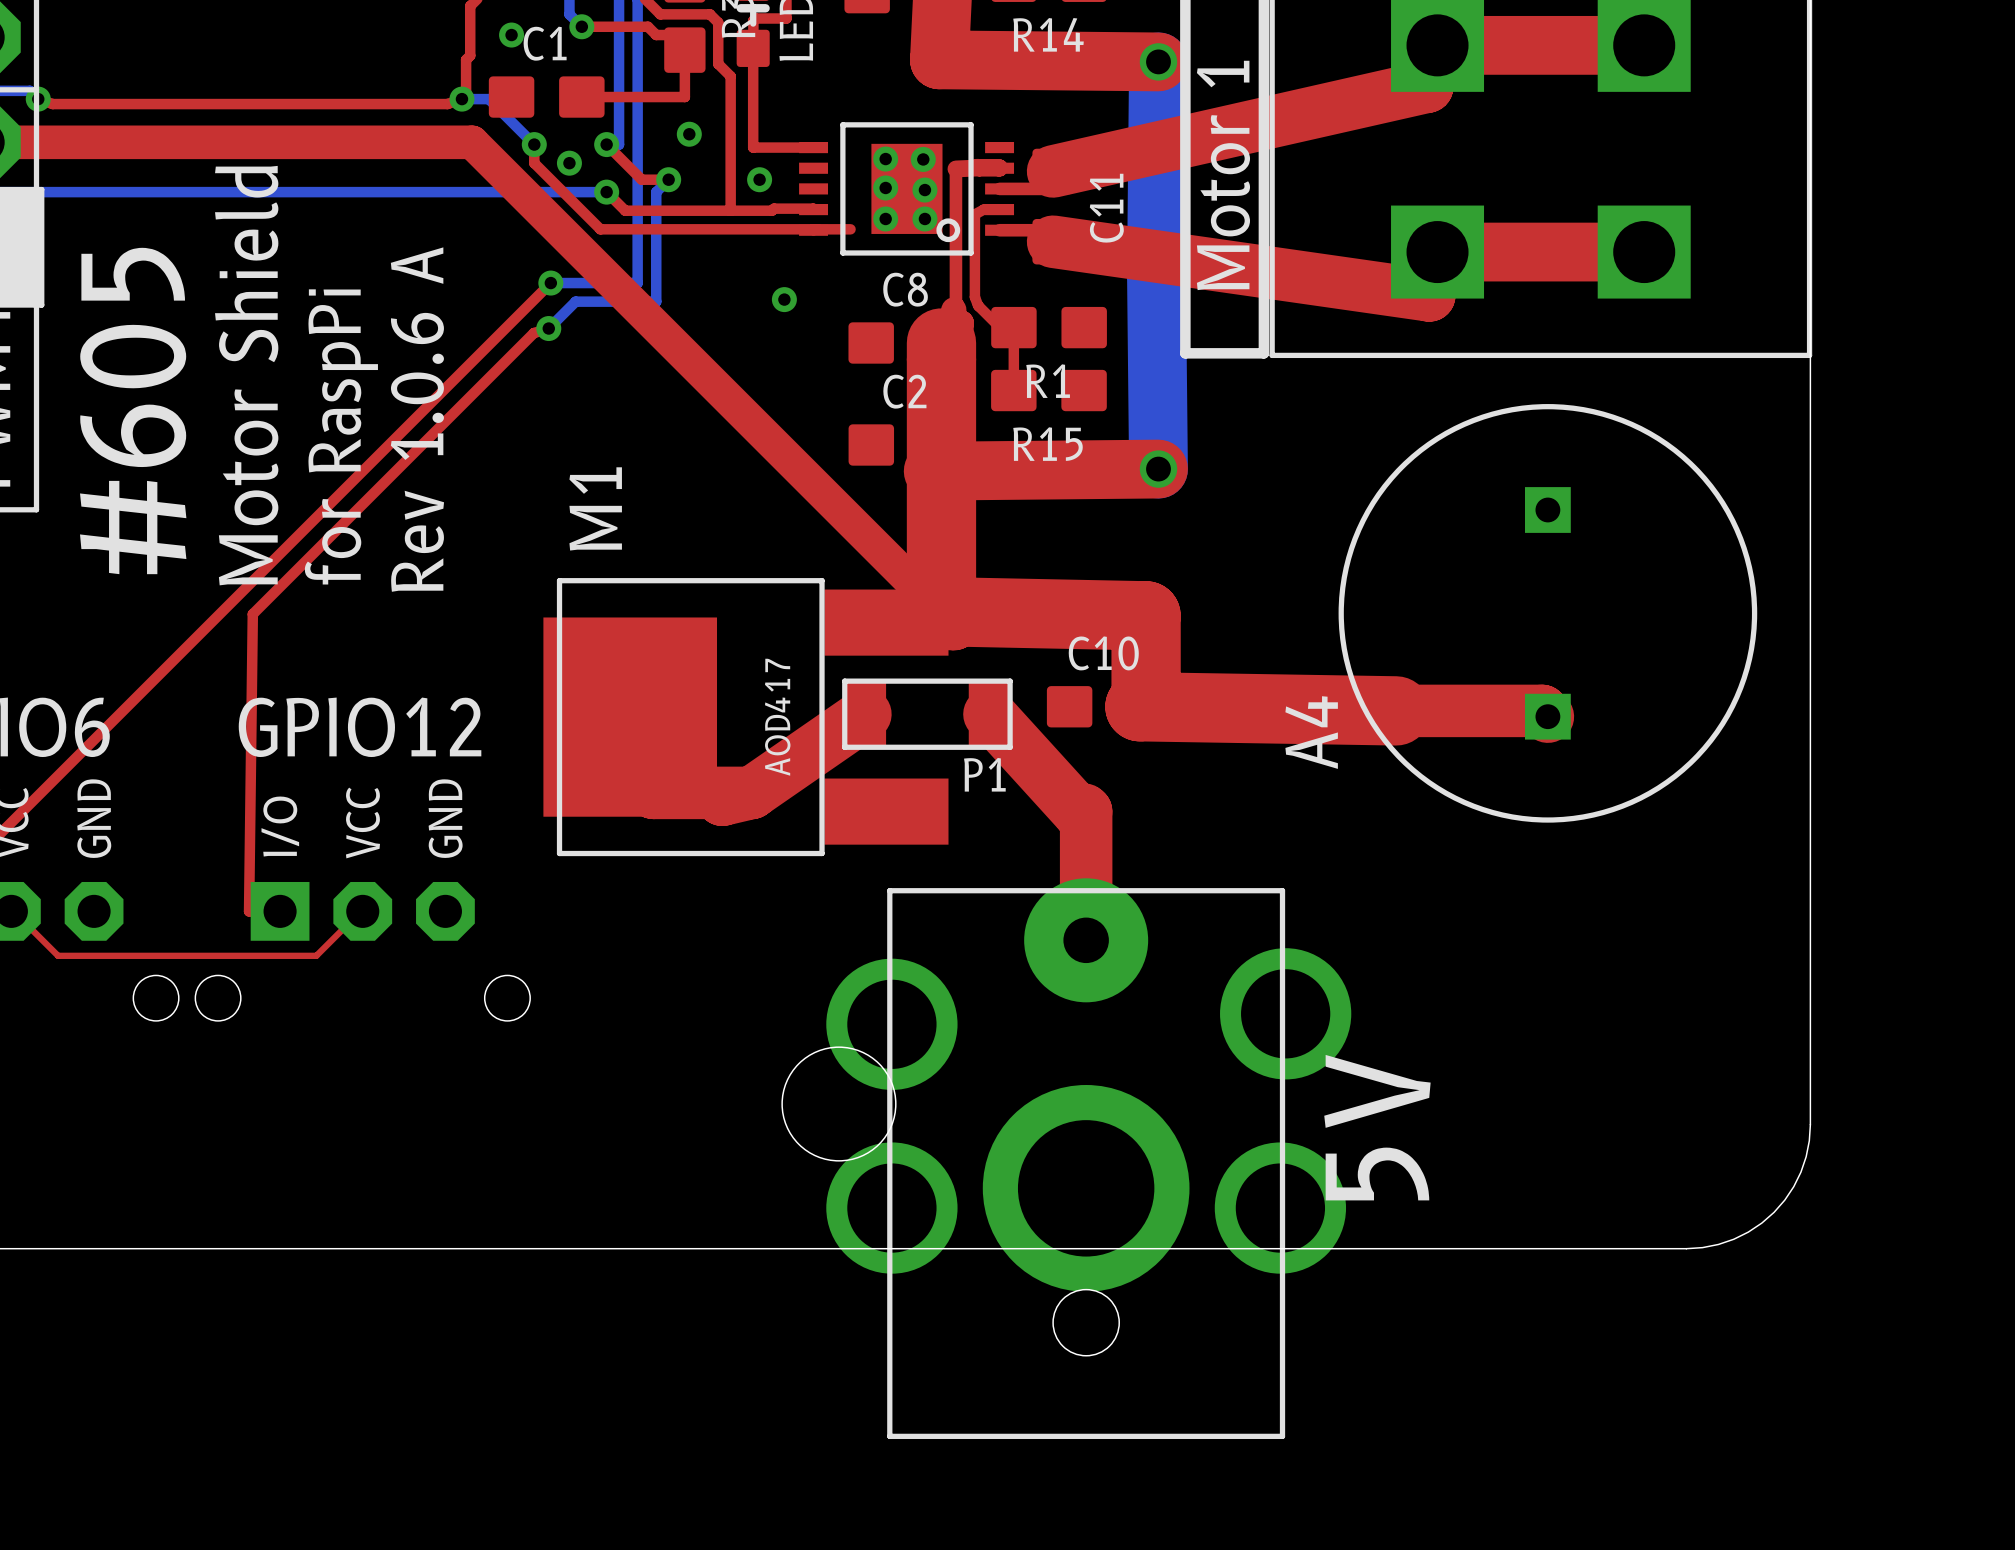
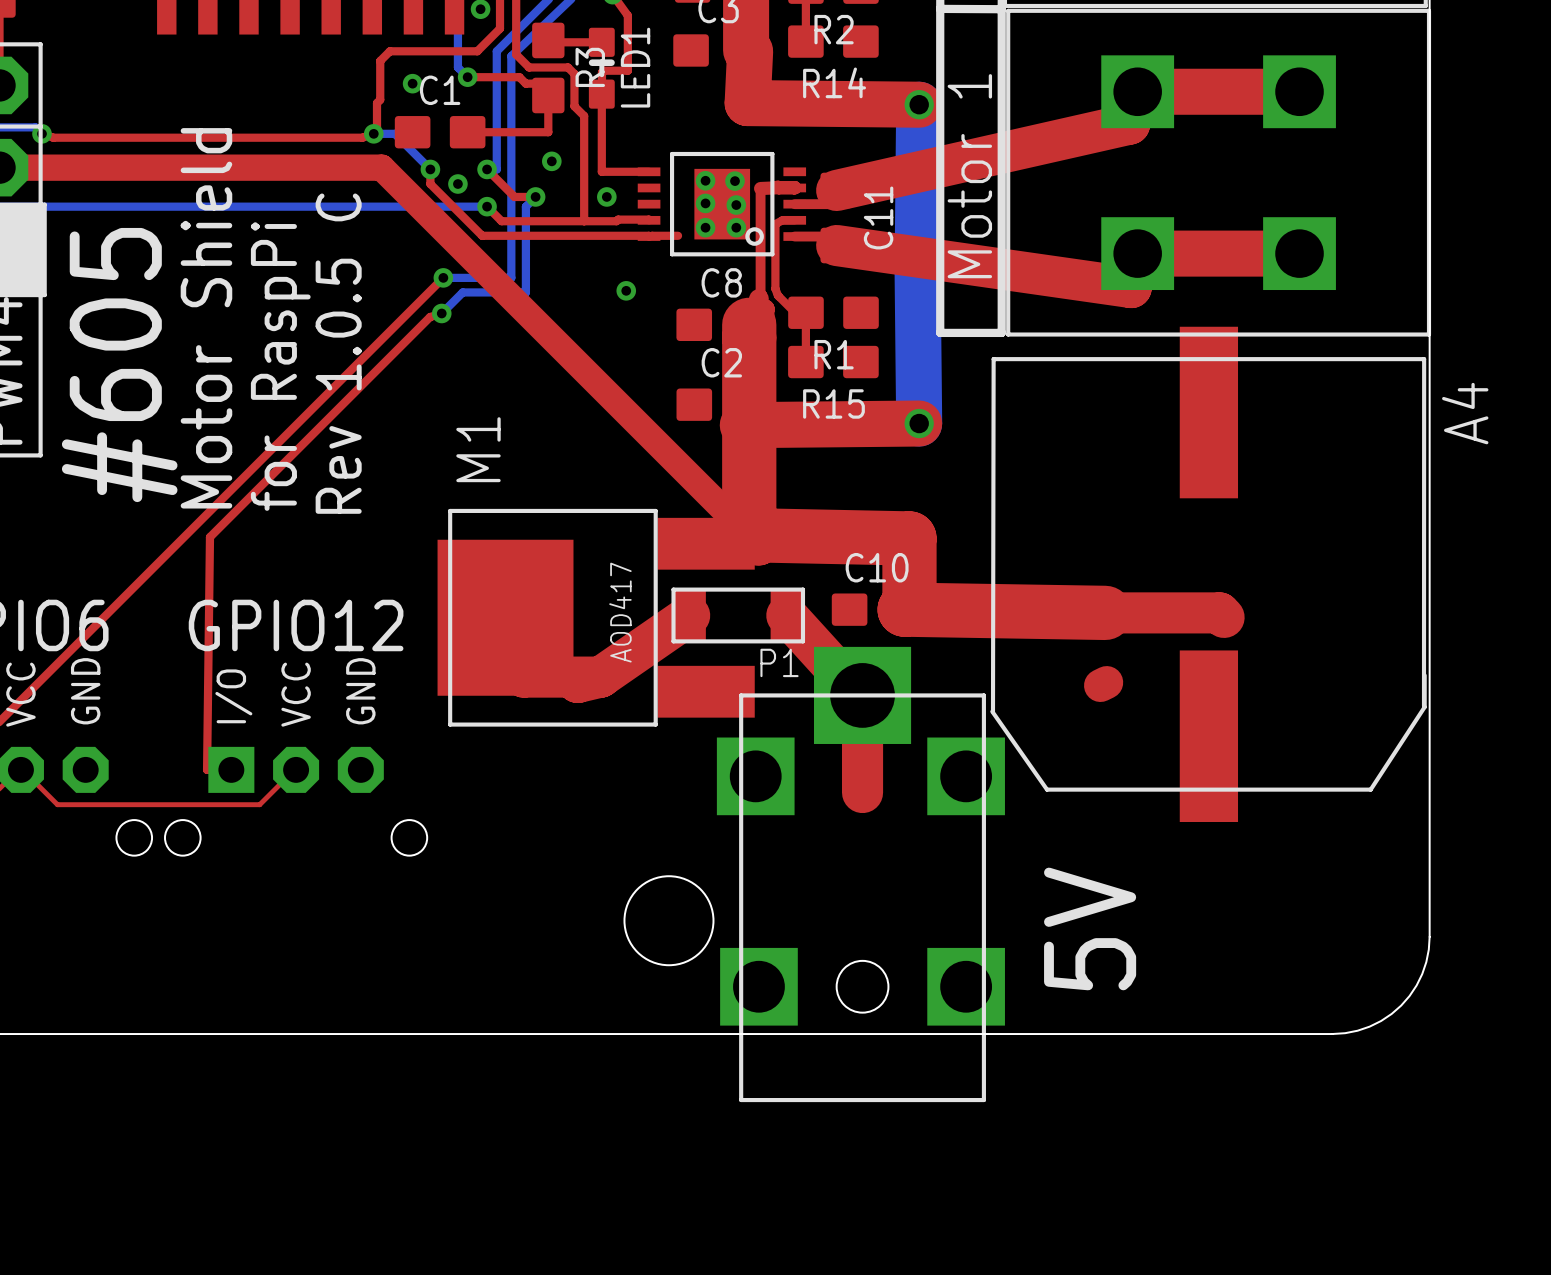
A4 footprint: [1338, 404, 1758, 823] -> [990, 326, 1427, 823]
text: Rev 1.0.6 A (417, 419) -> Rev 1.0.5 C (338, 353)
A4 name position: A4 (1311, 732) -> A4 (1465, 413)
top track: none -> (1106, 682) (1100, 685)
part: none -> (860, 874)
part: (1088, 1158) -> none

